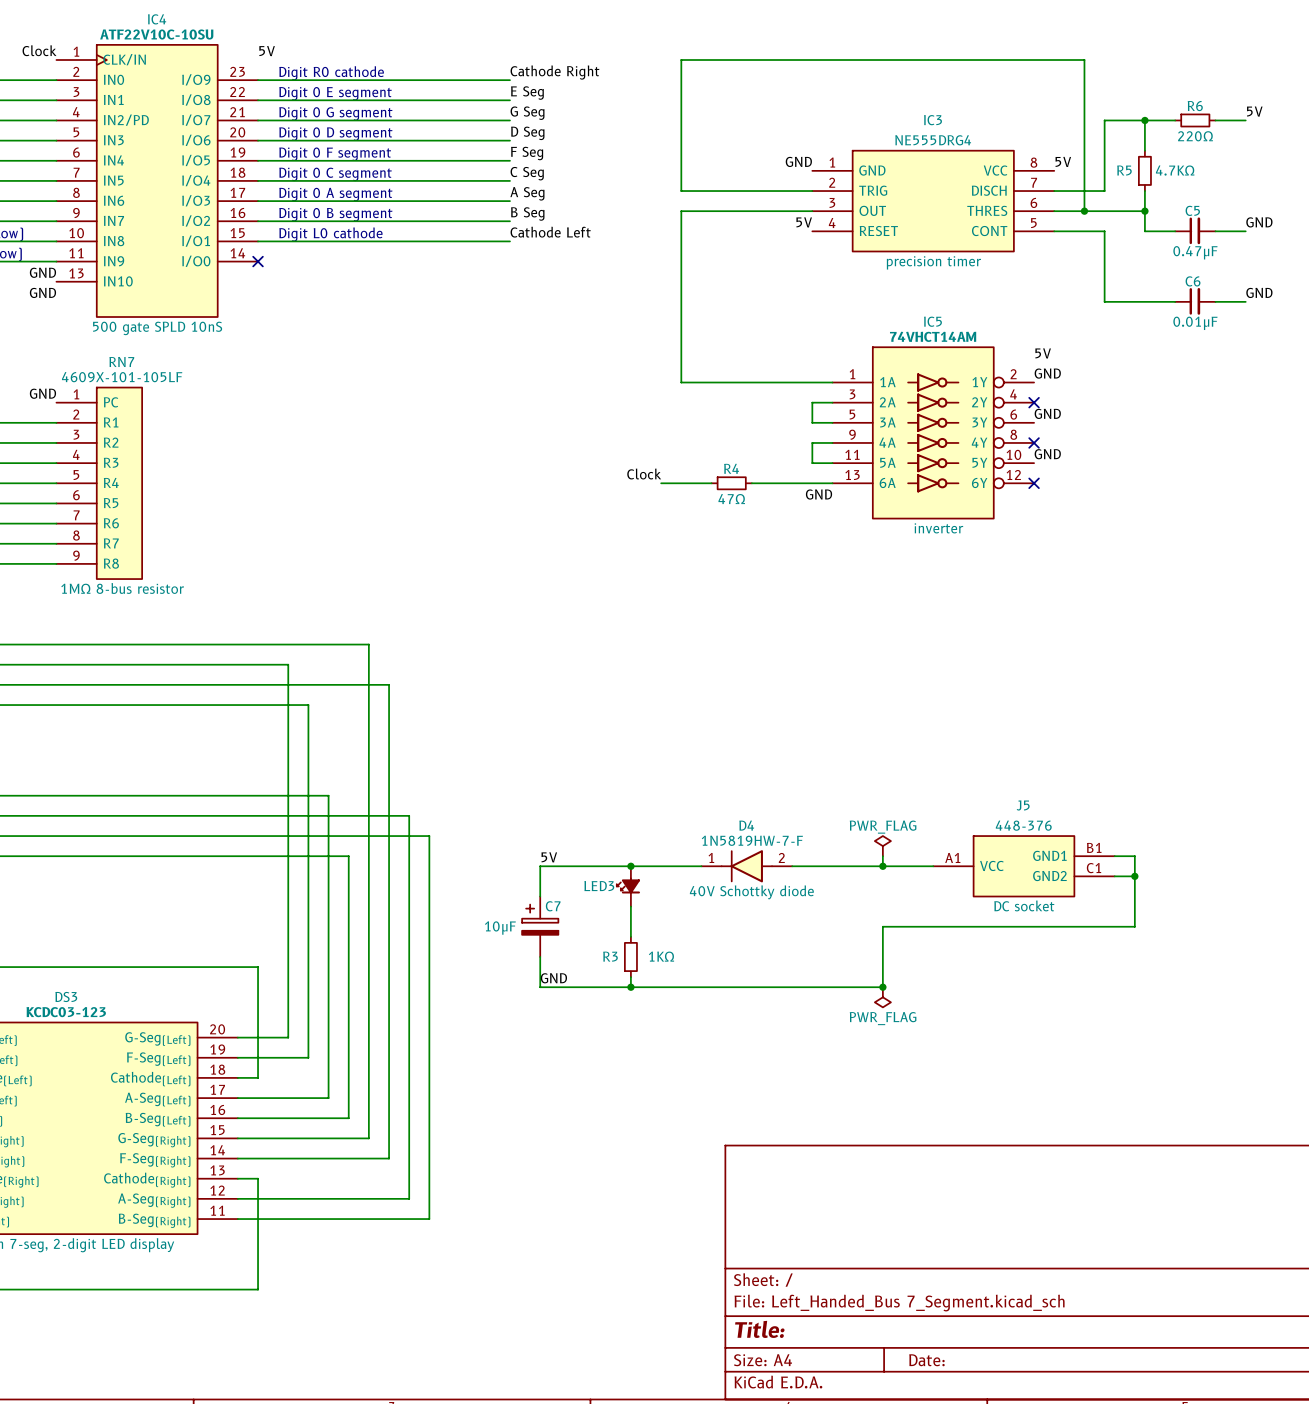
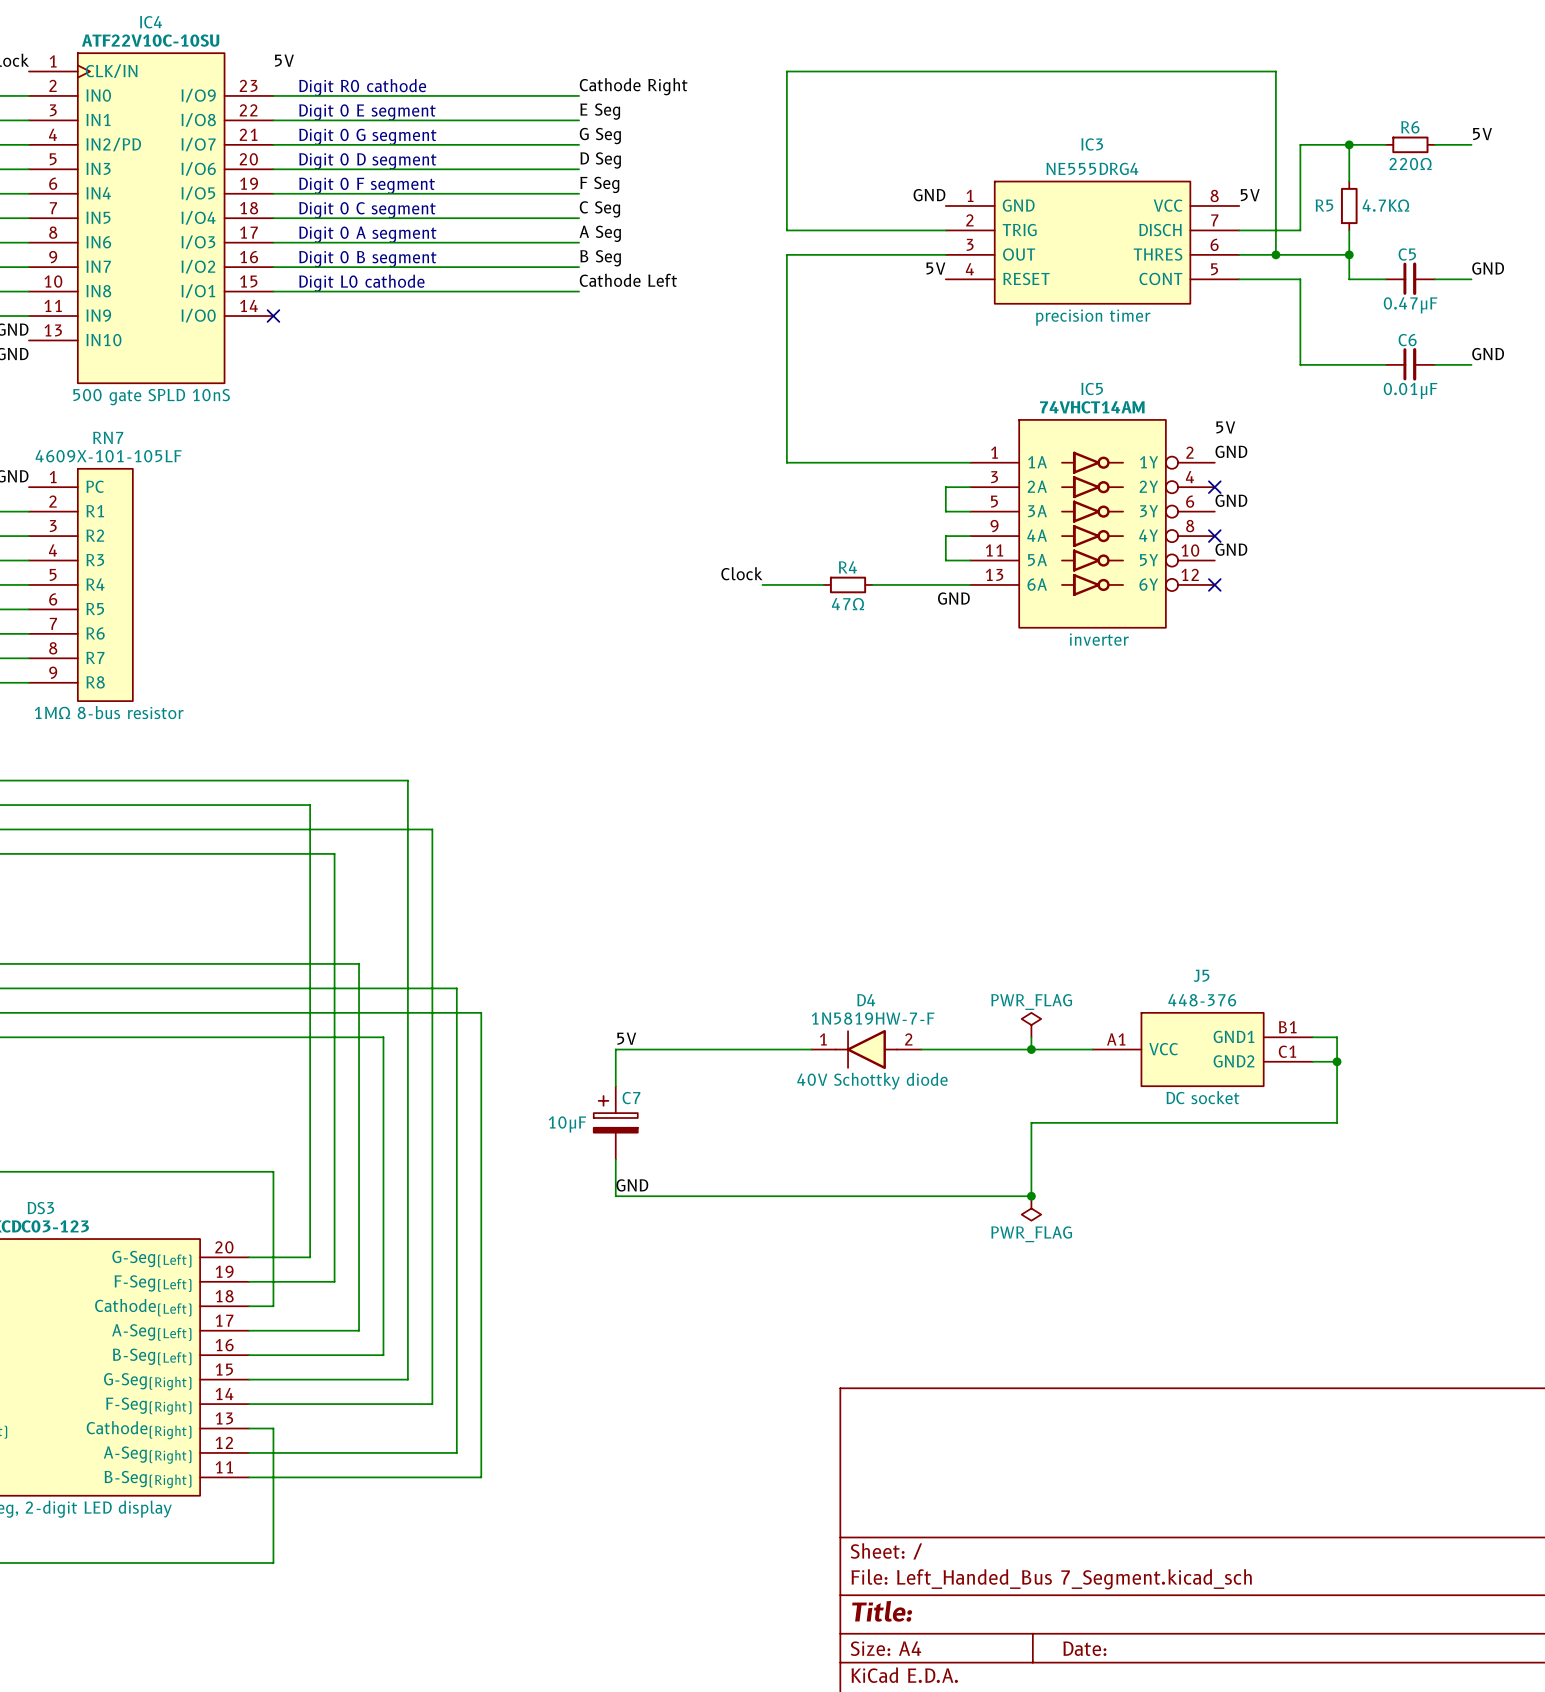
junction: (630, 866) -> none
LED3: (628, 886) -> none
wire: (630, 906) (630, 936) -> none
R3: (630, 956) -> none
wire: (630, 977) (630, 987) -> none
junction: (630, 987) -> none

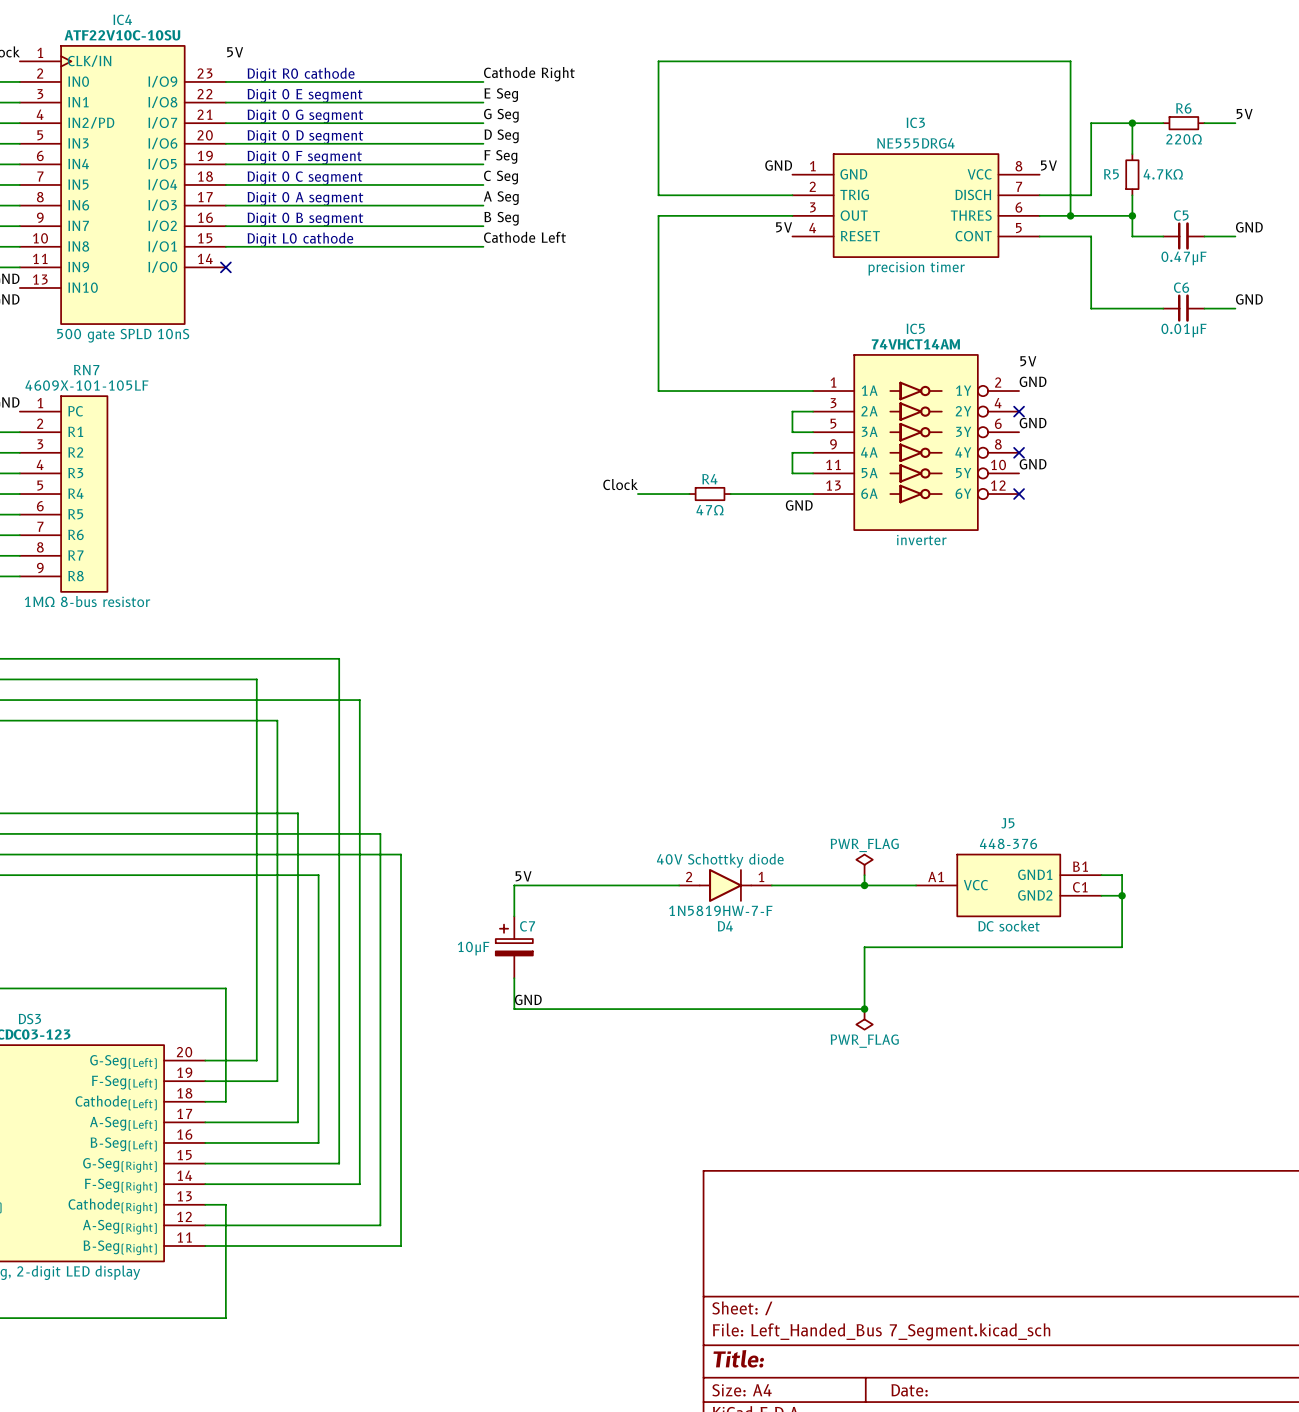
D4 rotation: 0° (866, 1049) -> 180° (725, 885)

